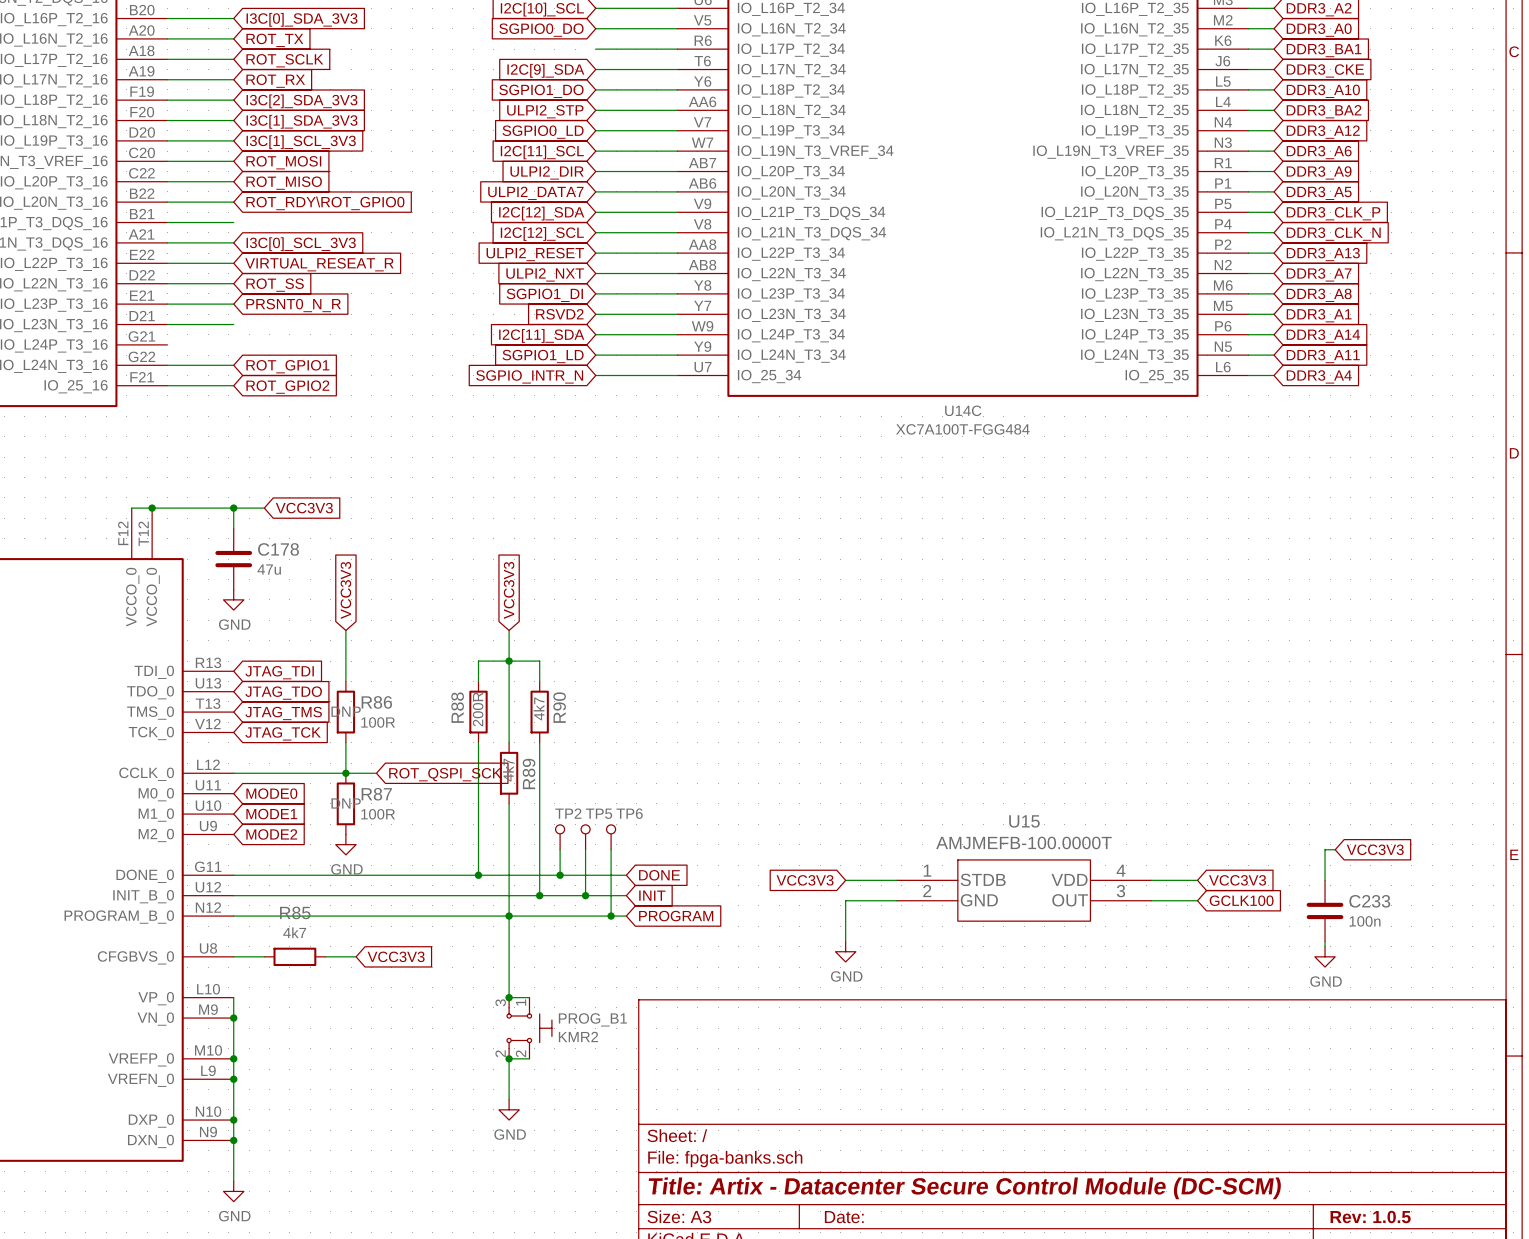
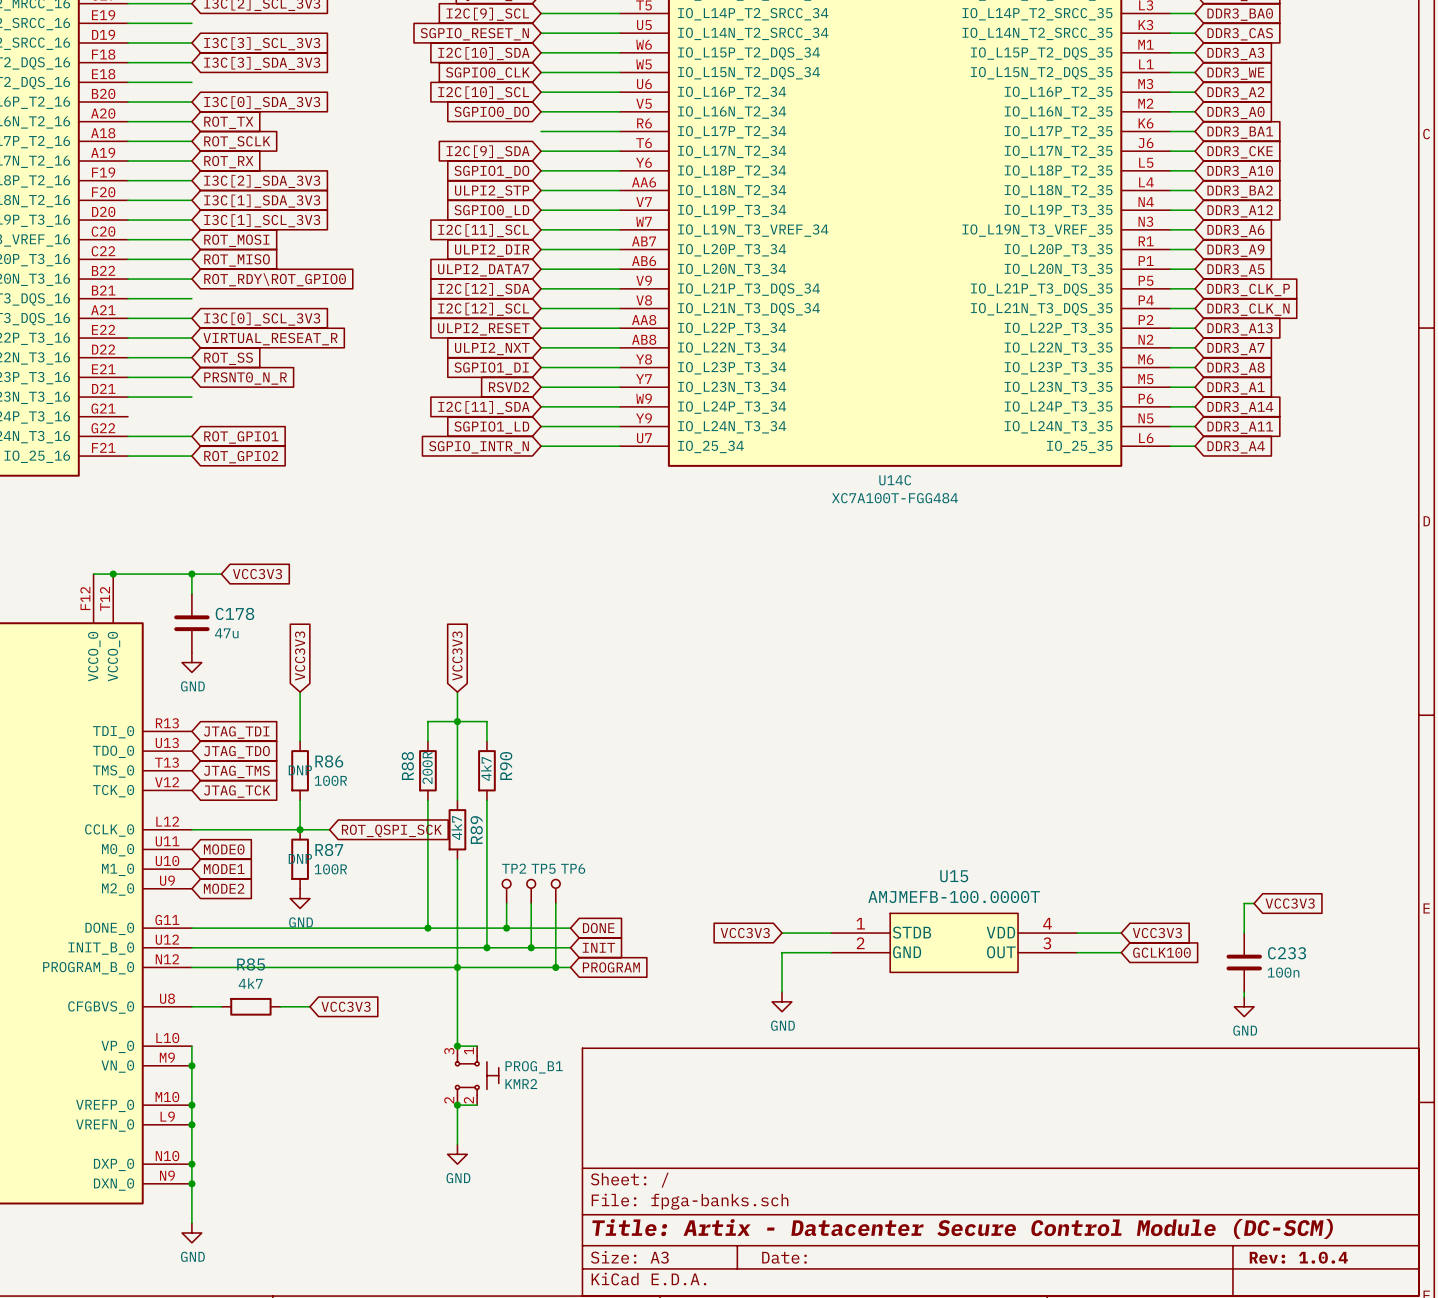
title block: Rev: 1.0.5 (1370, 1217) -> Rev: 1.0.4 (1298, 1257)

